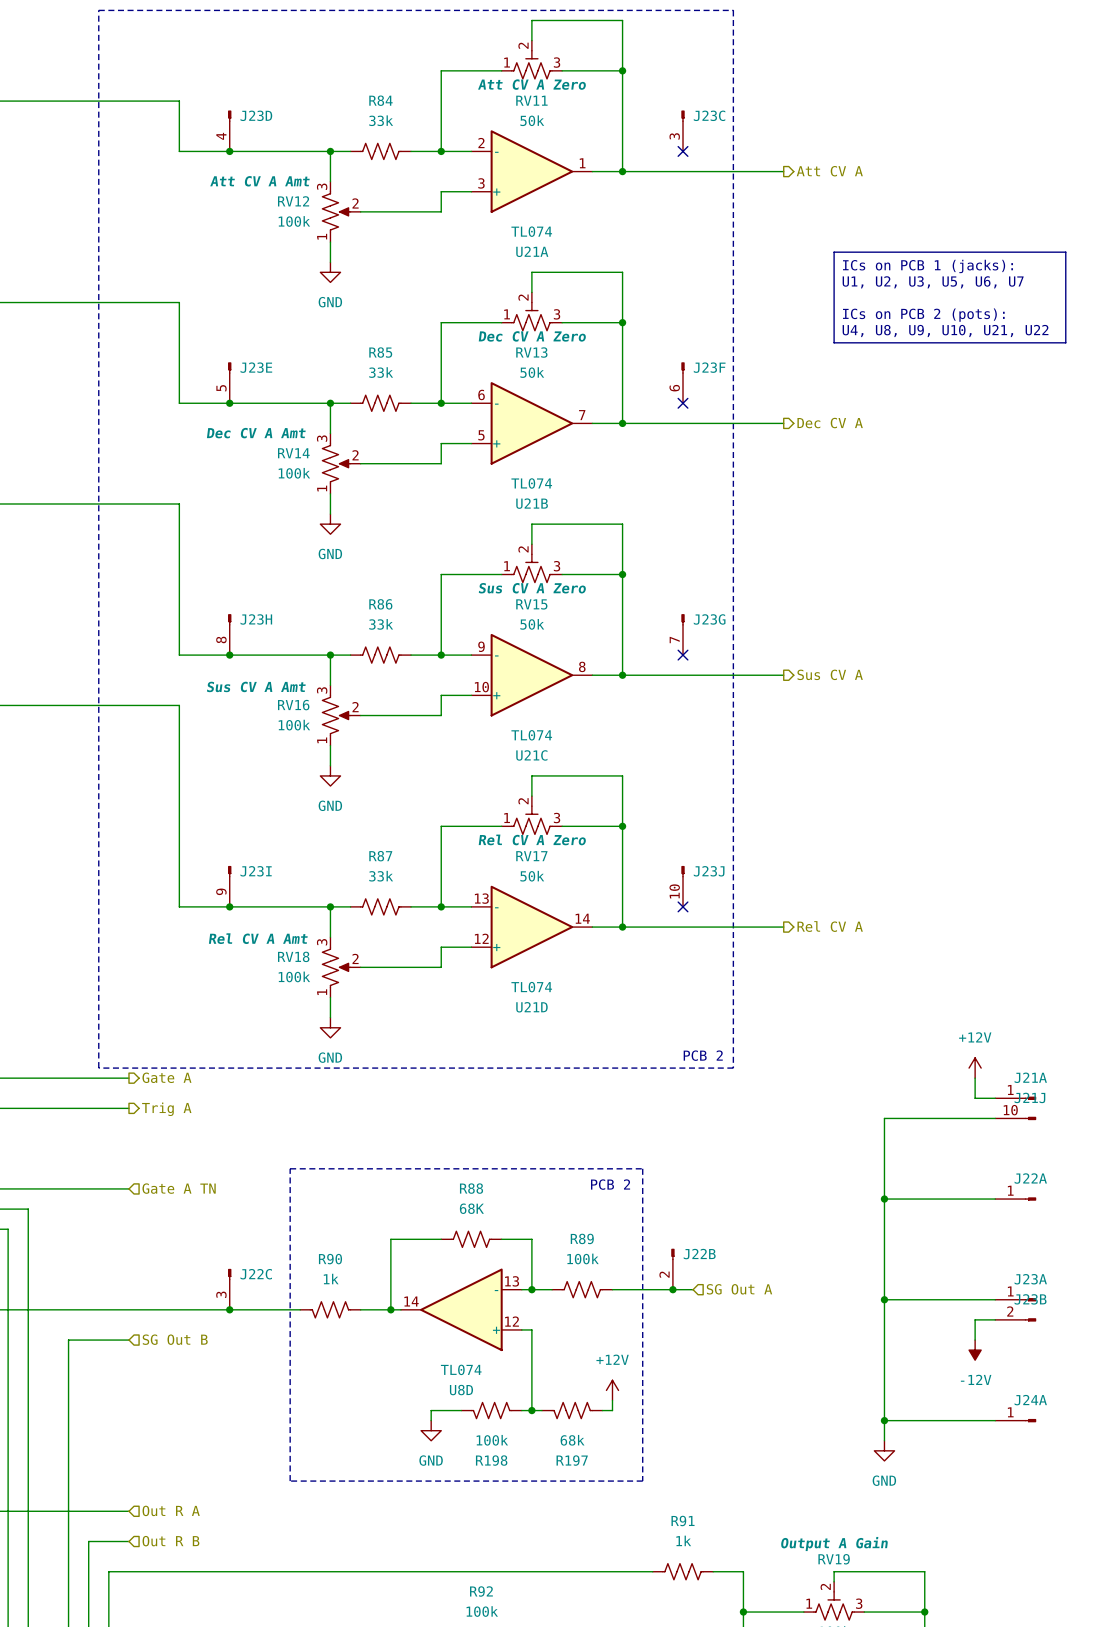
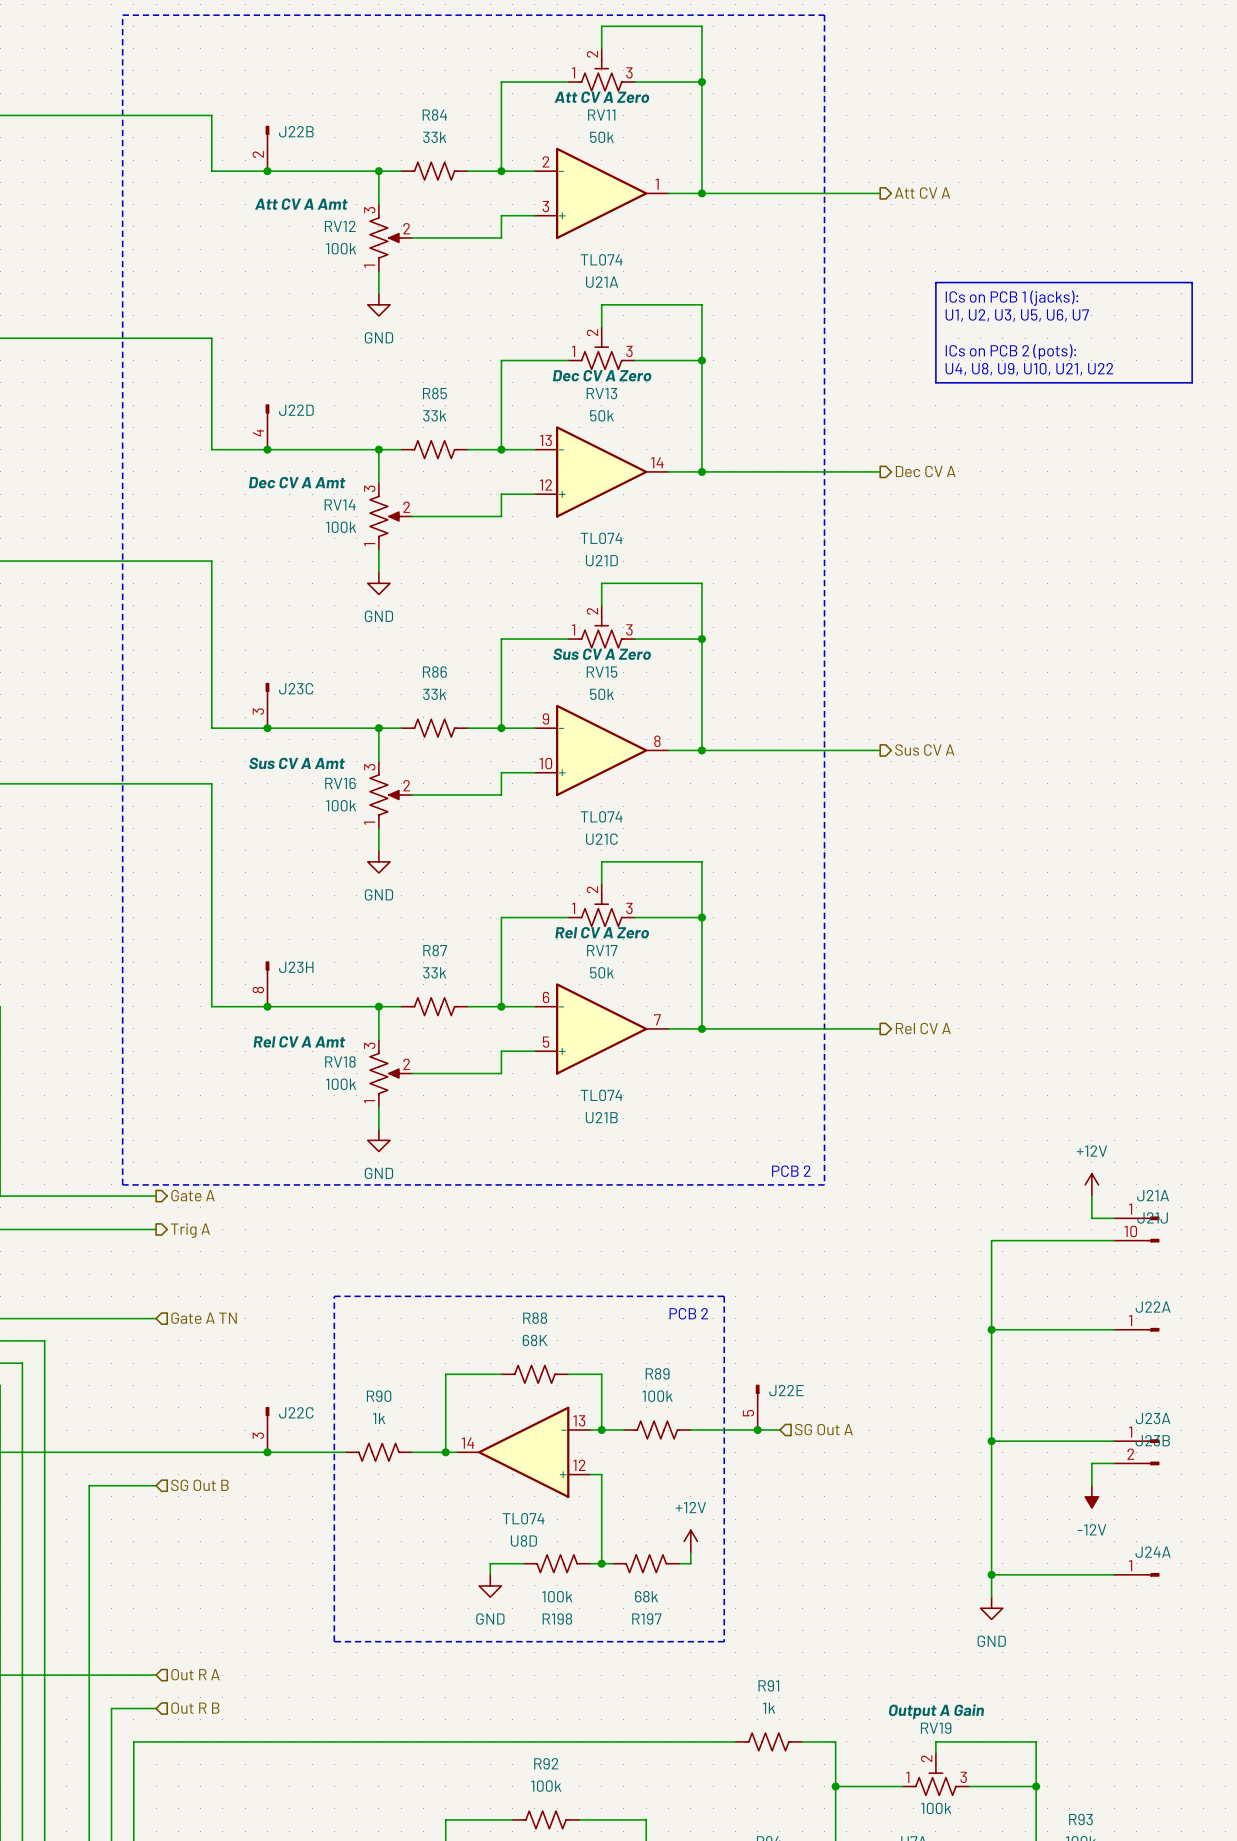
J23D: (229, 130) -> none
J23C position: (683, 130) -> (267, 705)
no-connect mark: (683, 151) -> none
J23E name: J23E (256, 367) -> J22D (296, 410)
J23F: (683, 382) -> none
J23E pin number: 5 (221, 388) -> 4 (258, 433)
no-connect mark: (683, 403) -> none
U21B position: (531, 423) -> (601, 1028)
J23H position: (229, 634) -> (267, 984)
J23G: (683, 634) -> none
no-connect mark: (683, 655) -> none
J23I: (229, 886) -> none
J23J: (683, 886) -> none
no-connect mark: (683, 906) -> none
U21D position: (531, 927) -> (601, 471)
J22B position: (672, 1269) -> (267, 148)
J22E: none -> (757, 1407)

